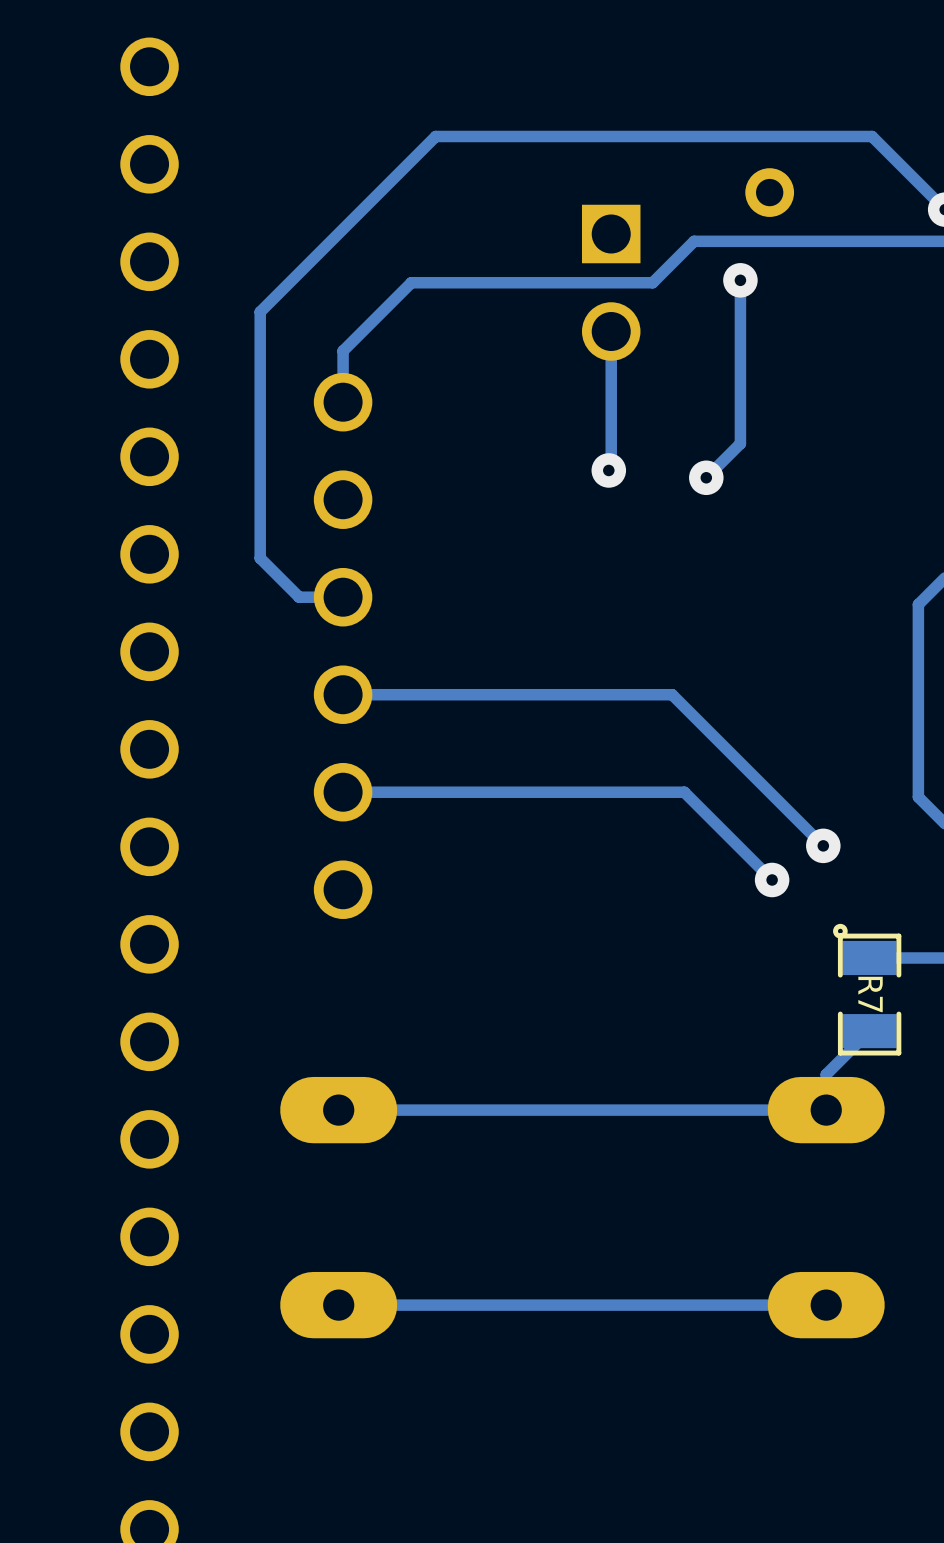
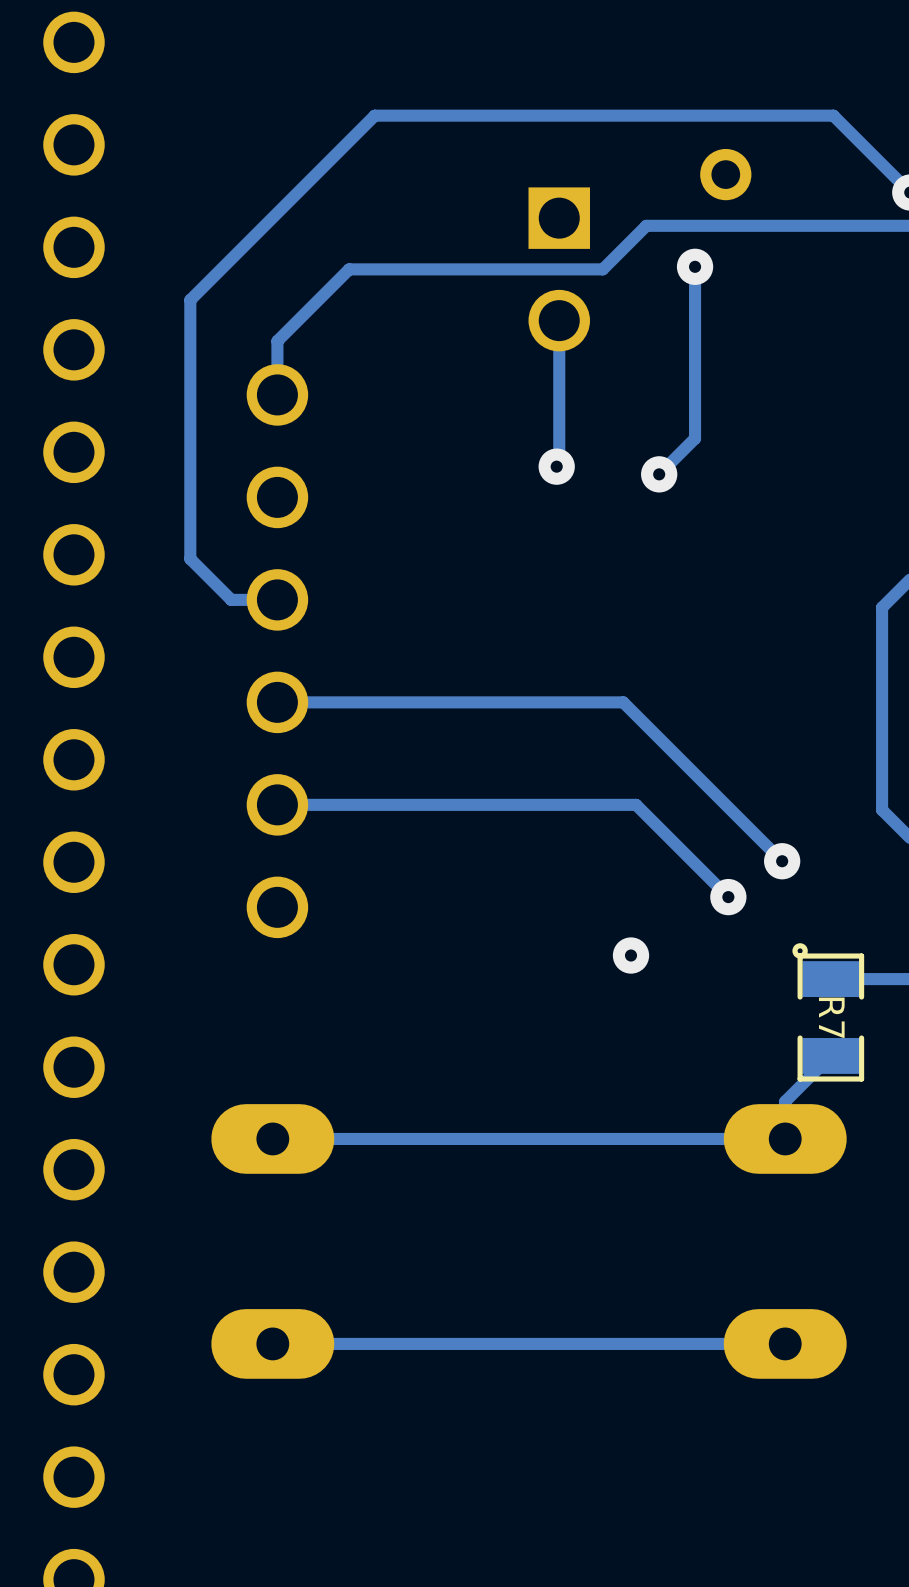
via: none -> (631, 955)

